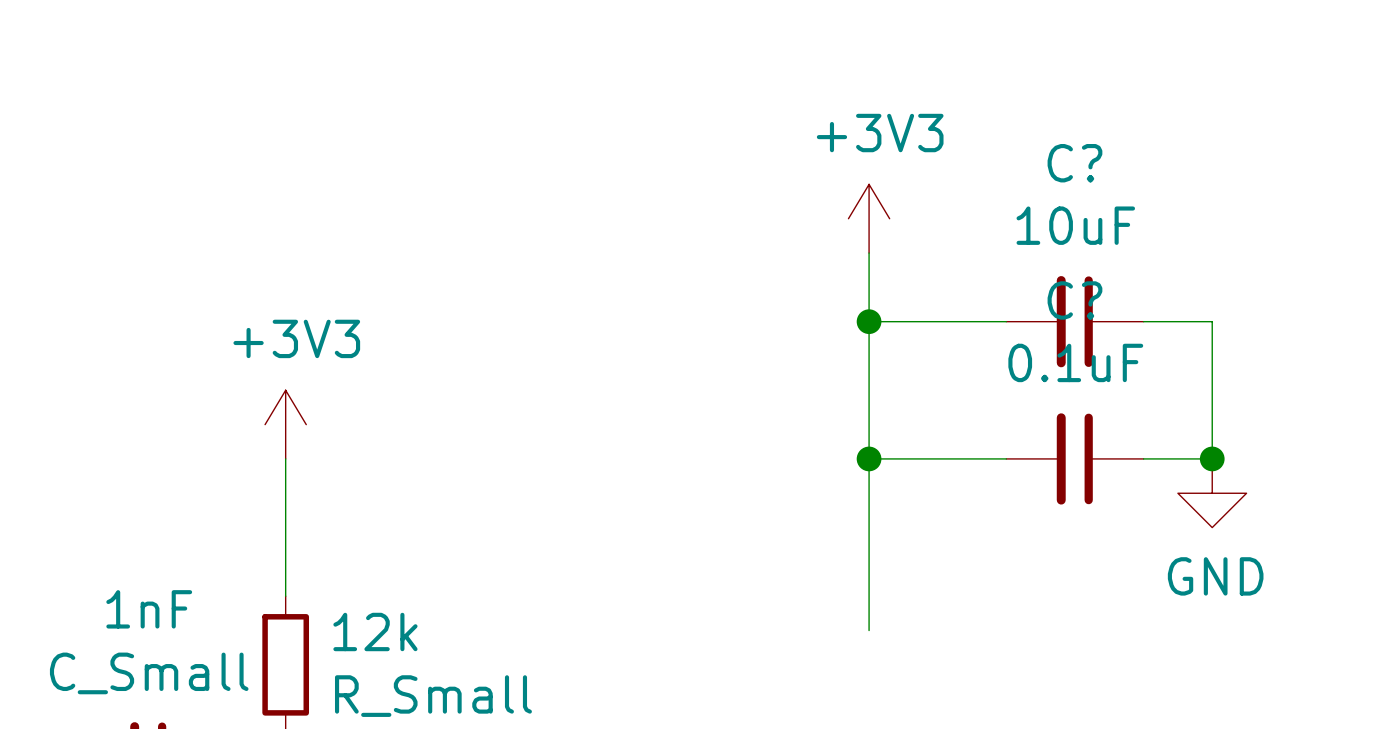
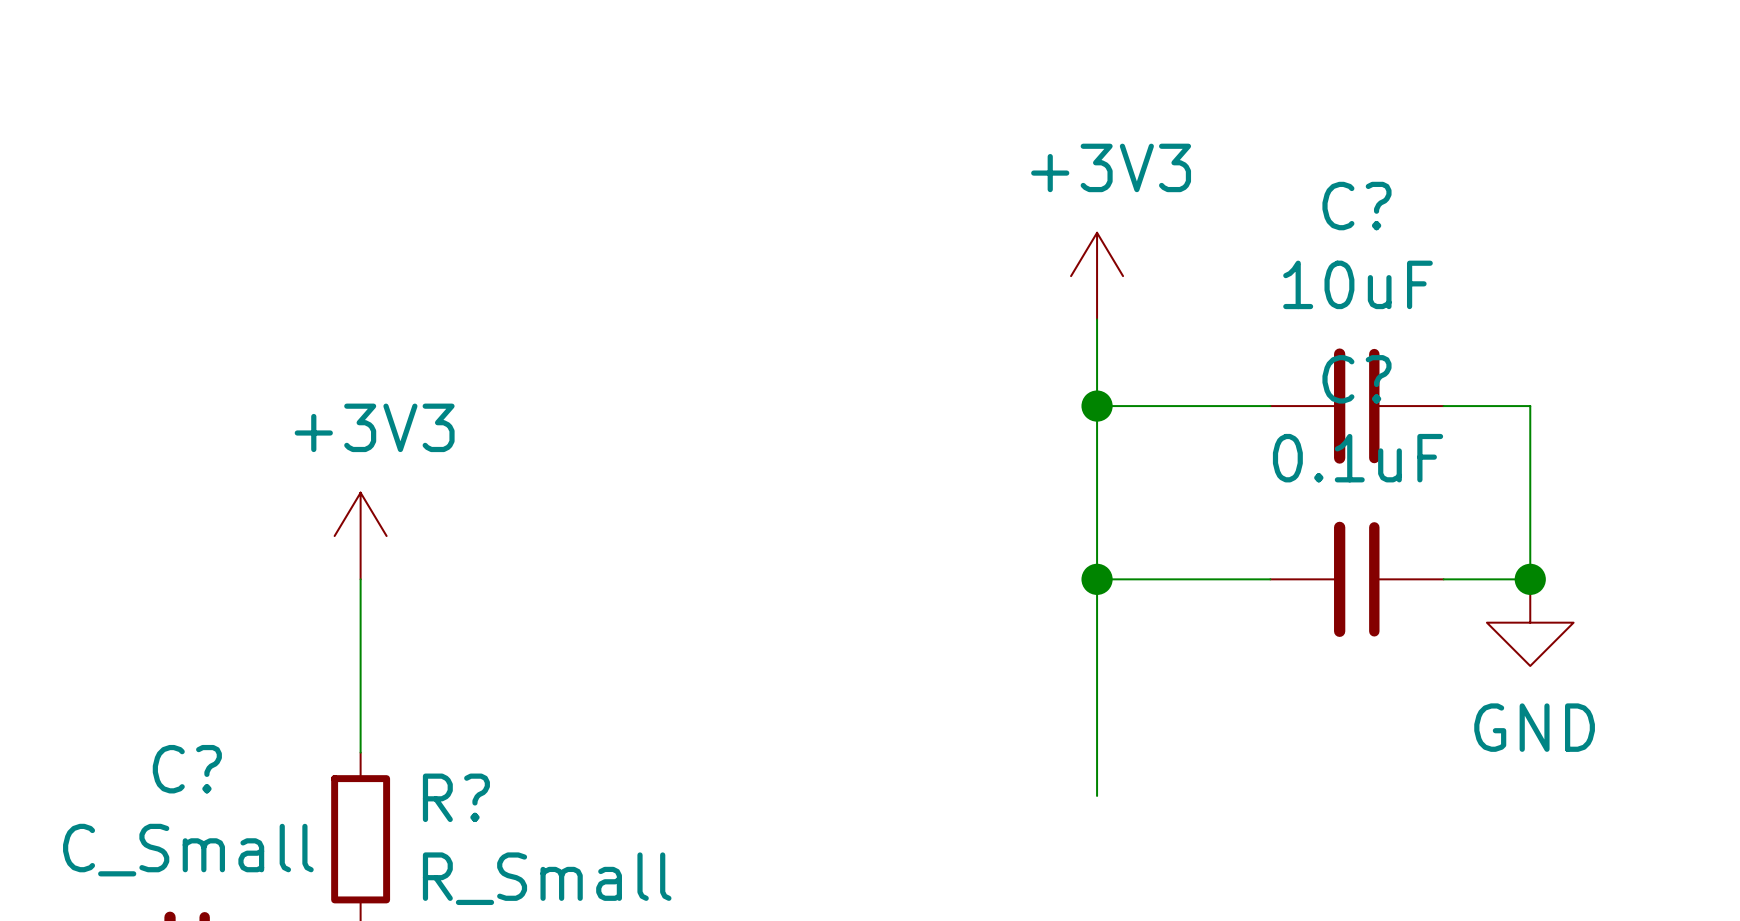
1nF name: 1nF (149, 609) -> C? (187, 769)
12k name: 12k (375, 631) -> R? (456, 797)

